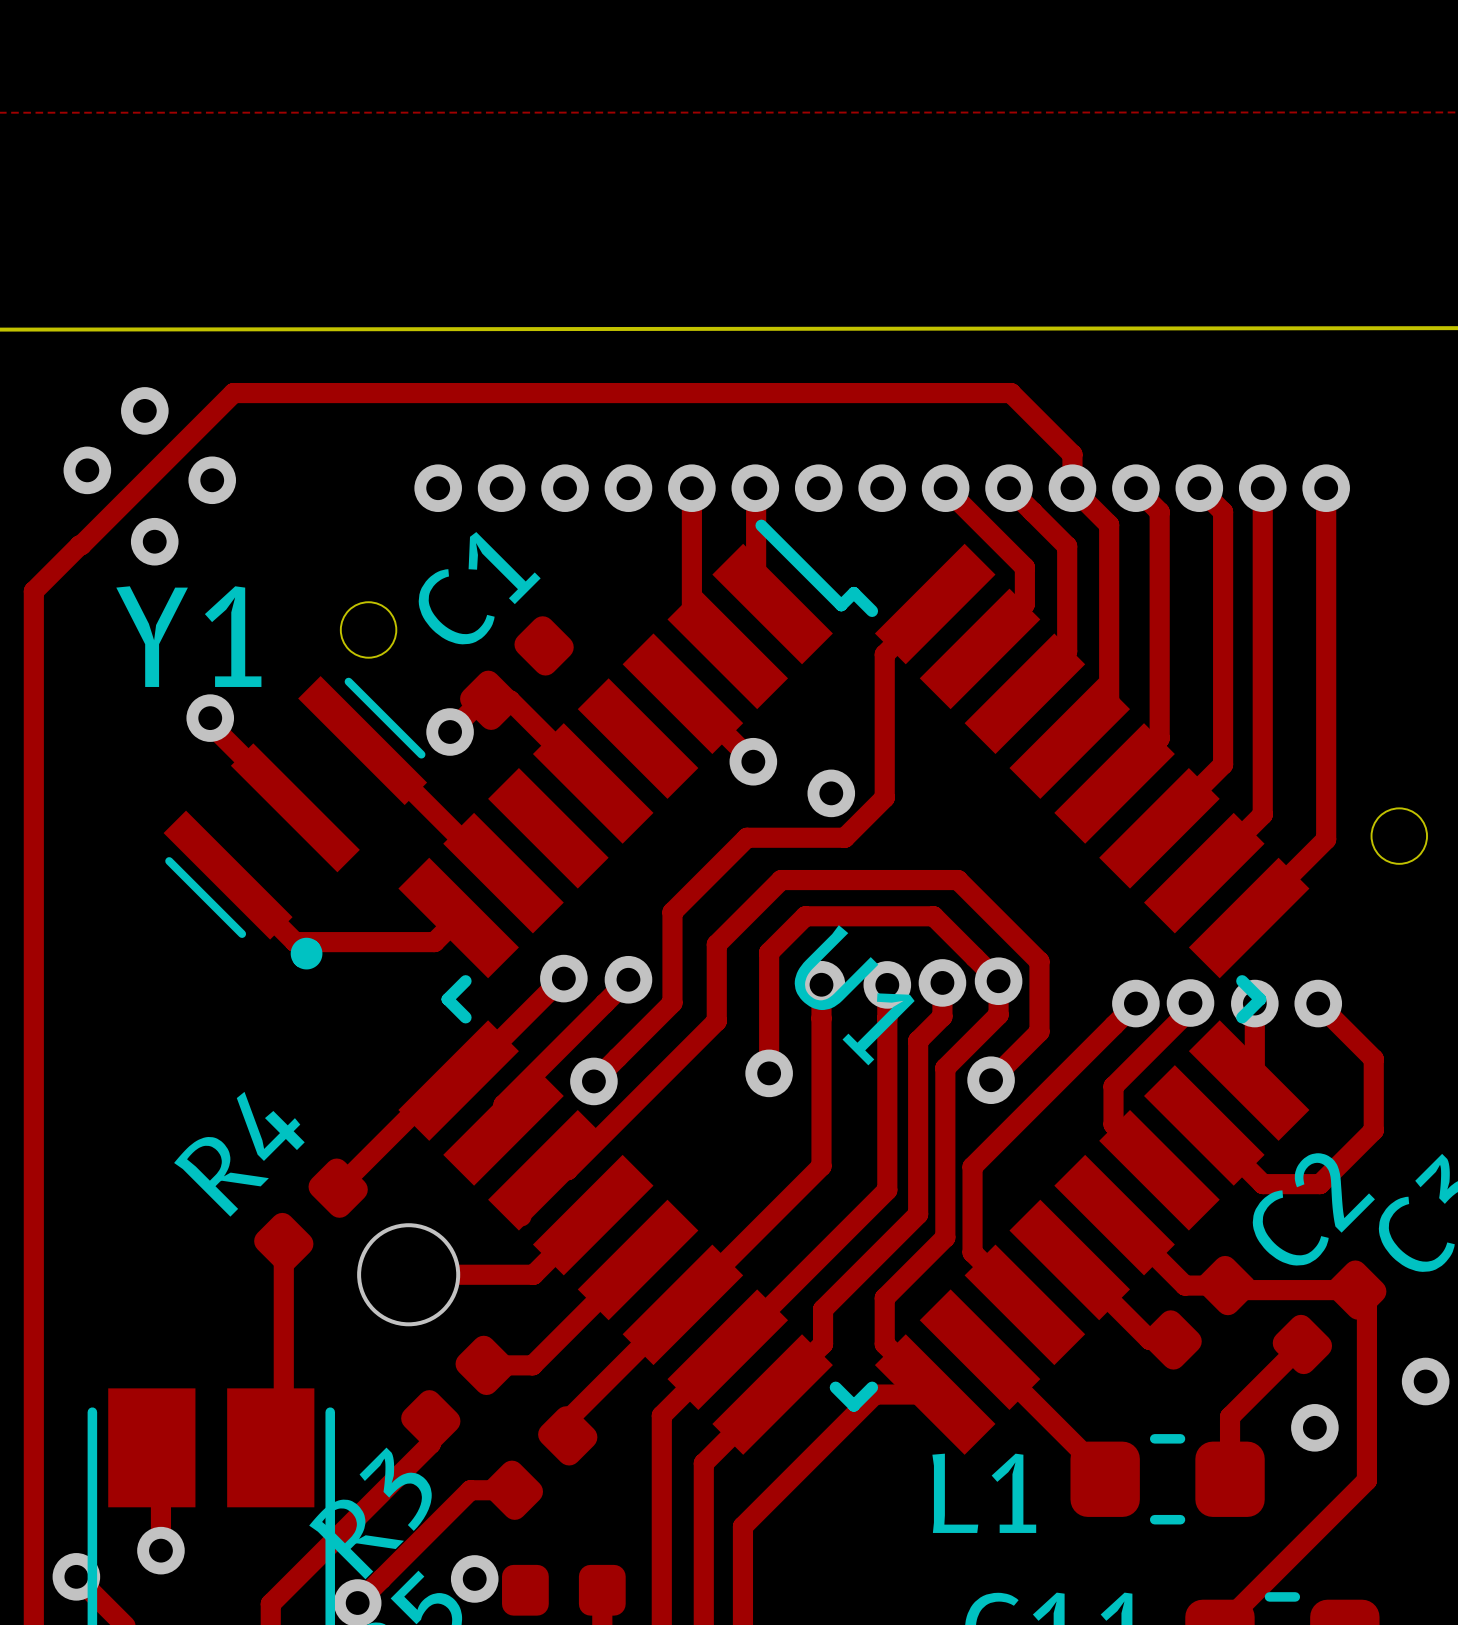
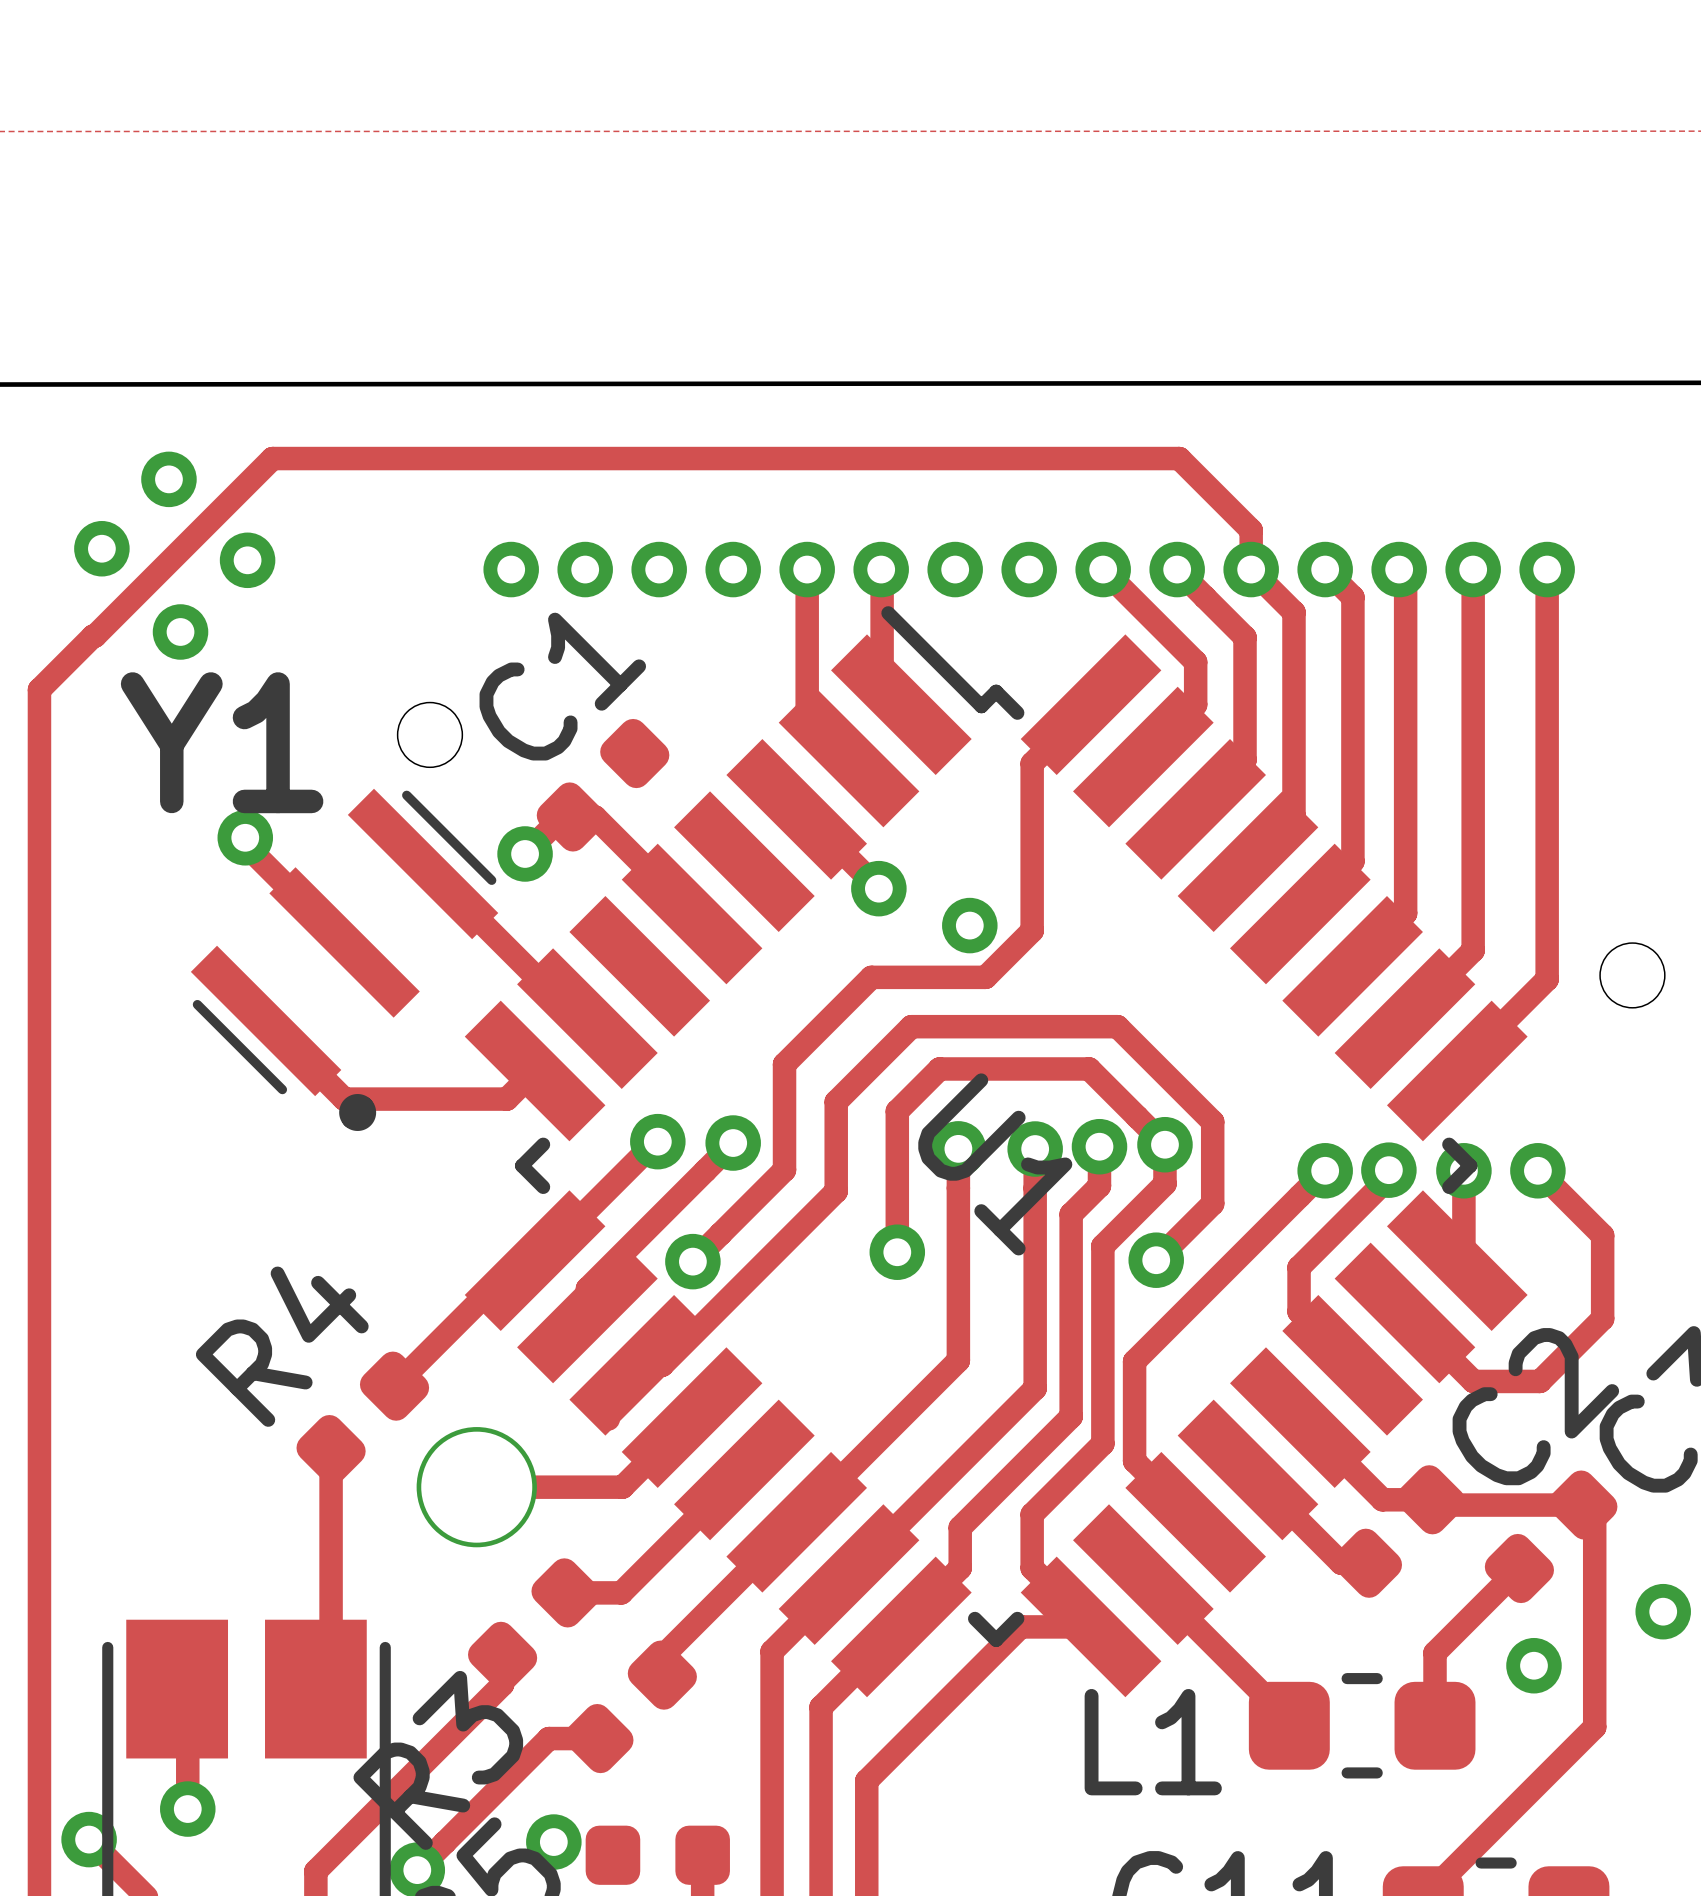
track: (1204, 493) (1223, 511) (1223, 764) (1204, 782) -> (1405, 576) (1405, 913)

